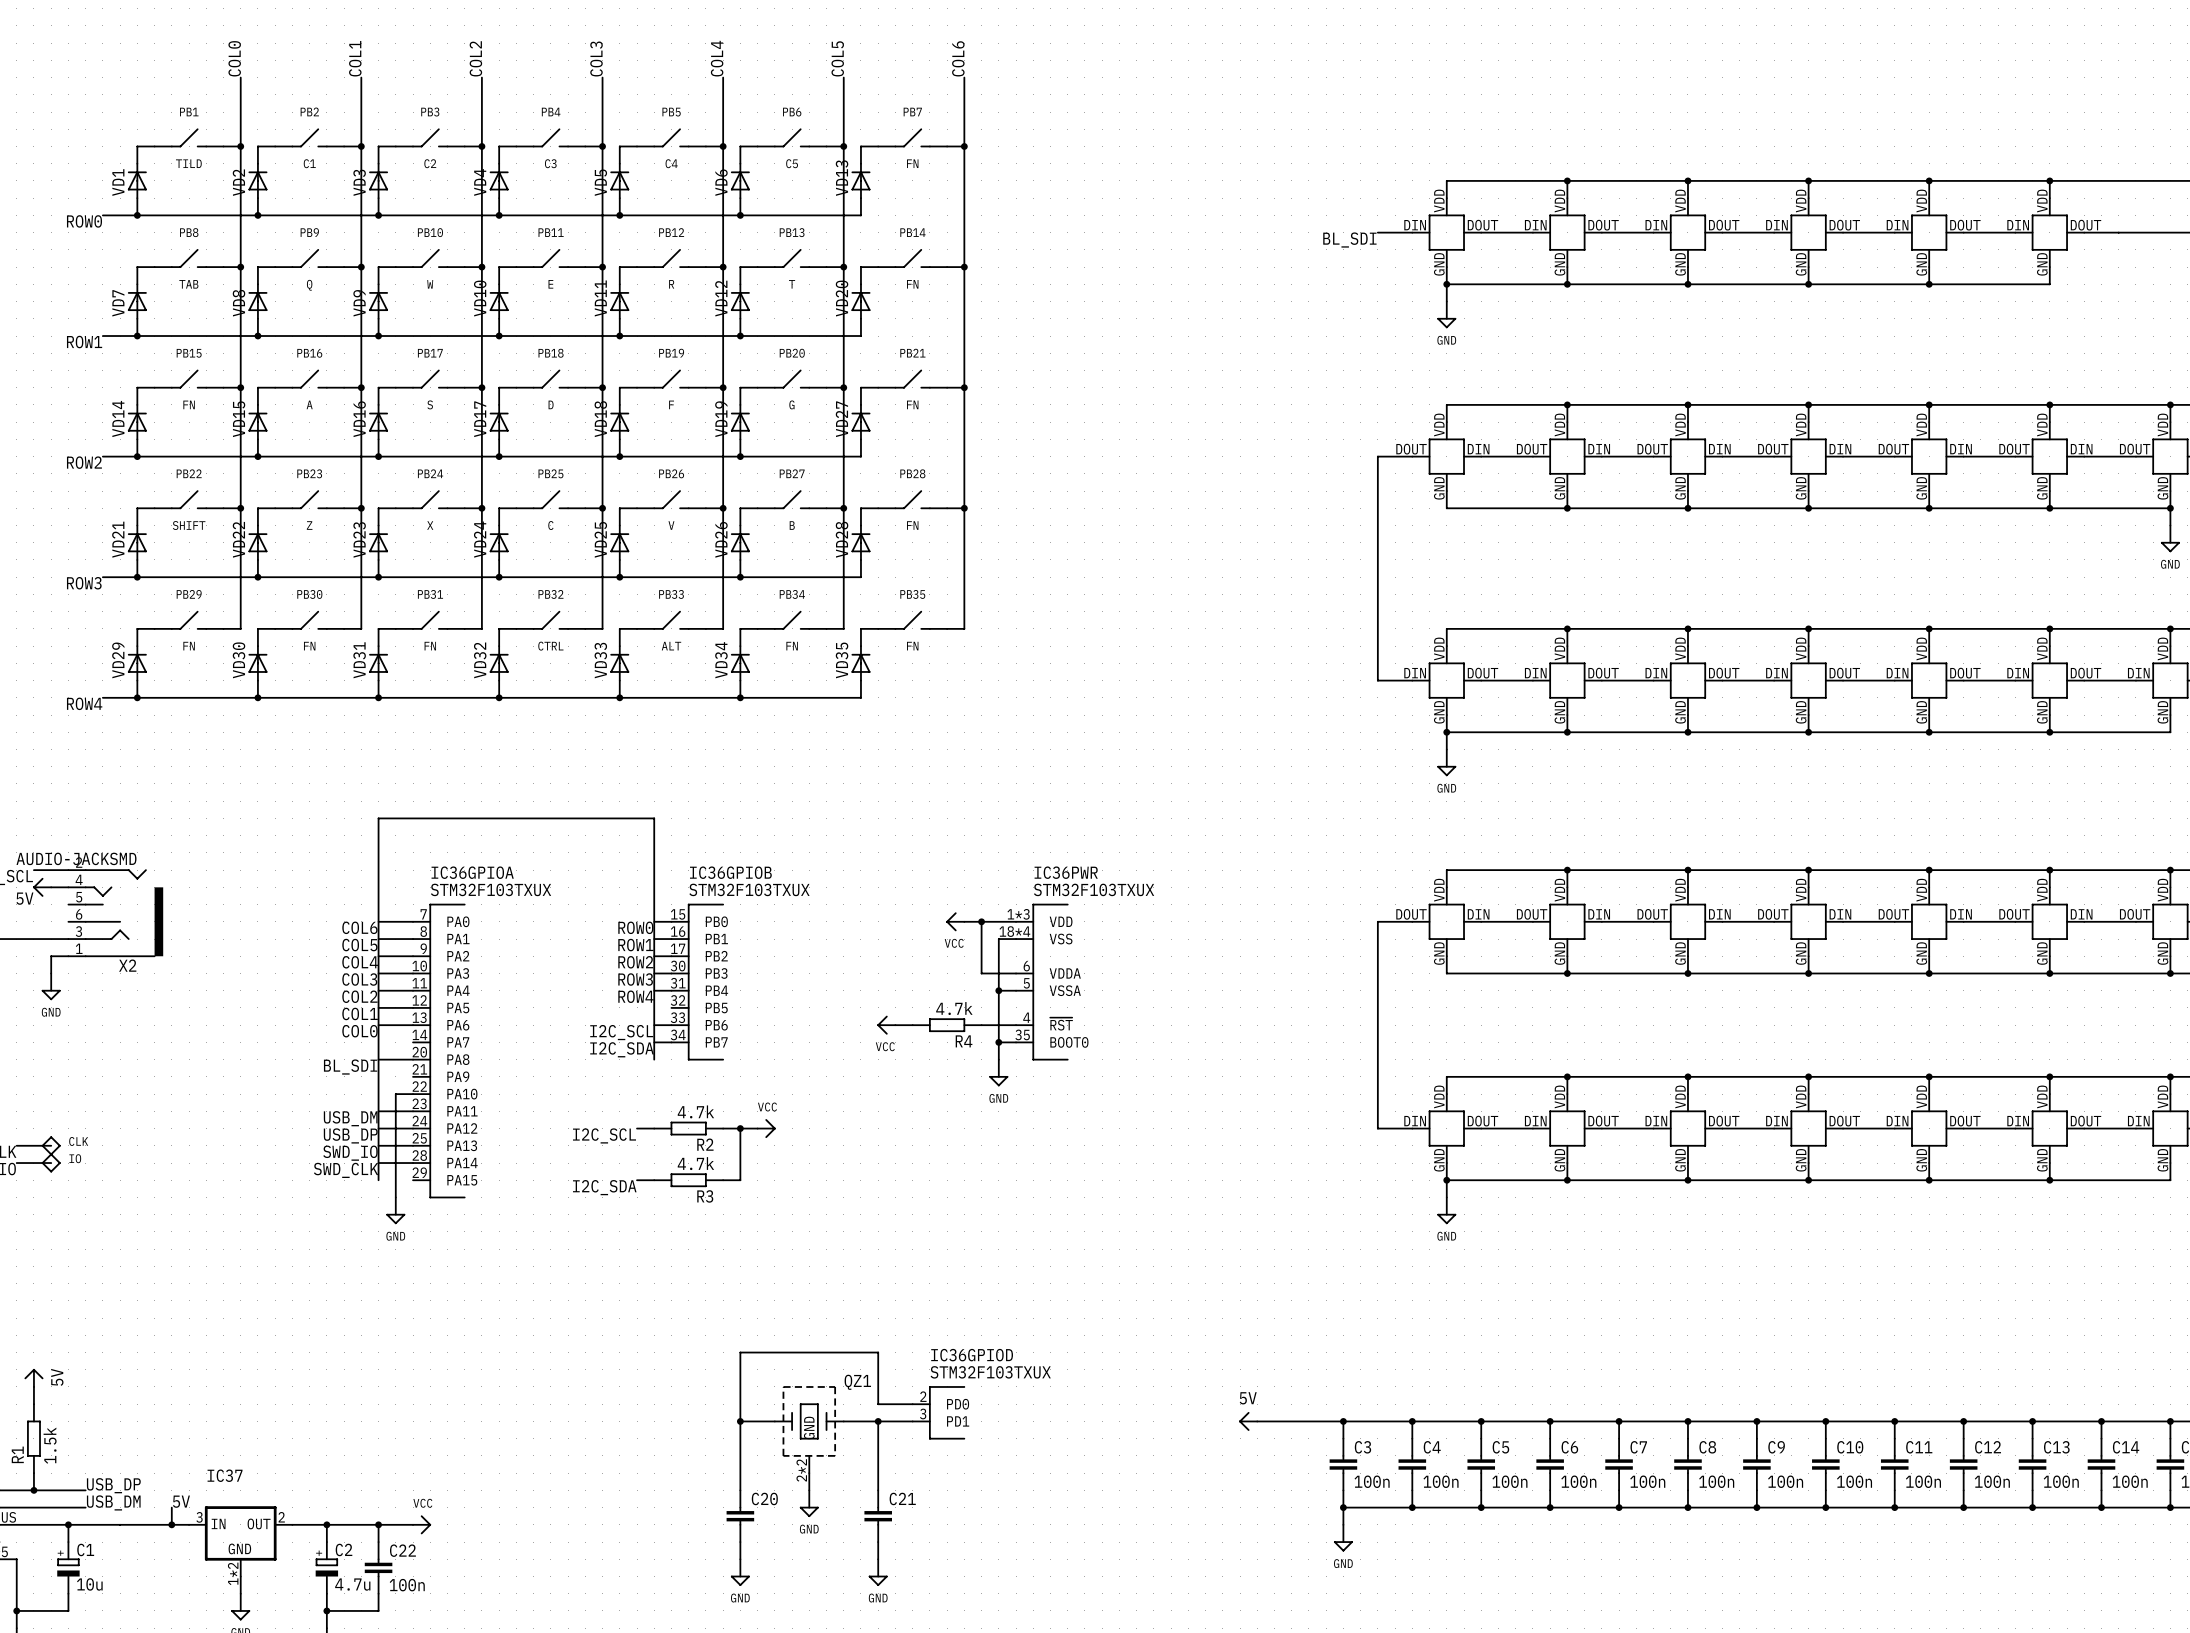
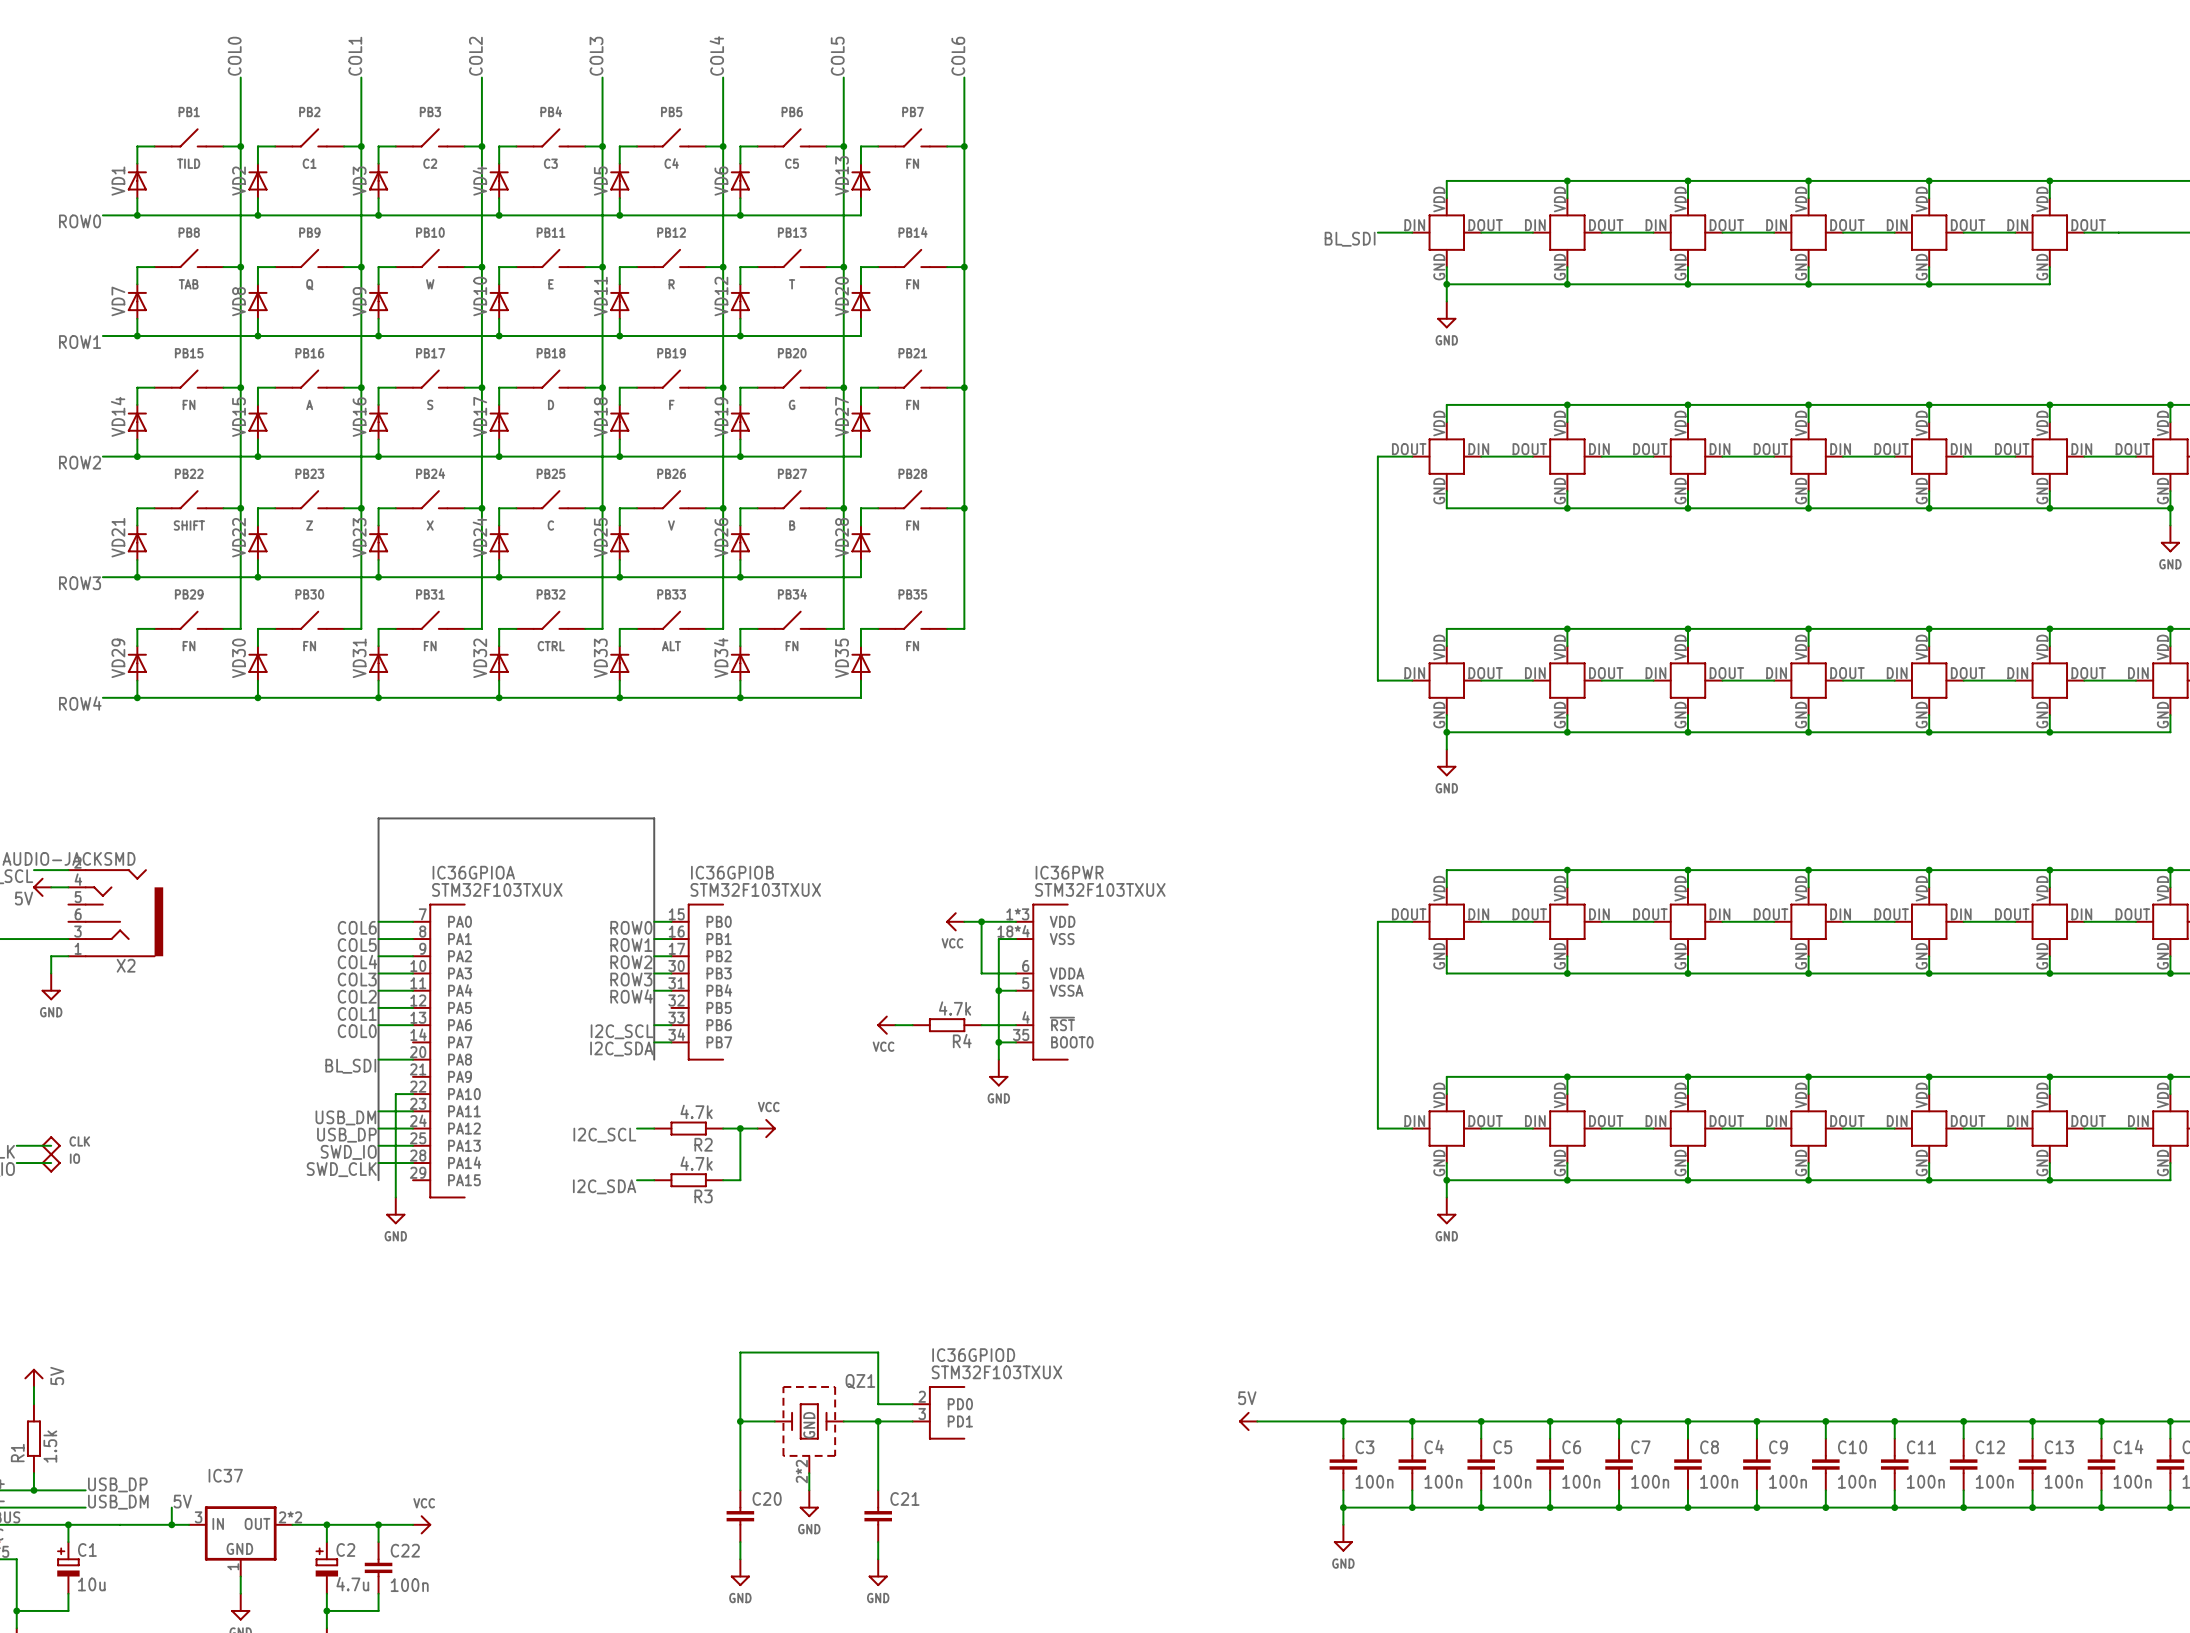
IC37 pin number: 2 (281, 1517) -> 2*2 (290, 1517)
IC37 pin number: 1*2 (233, 1573) -> 1 (233, 1566)

